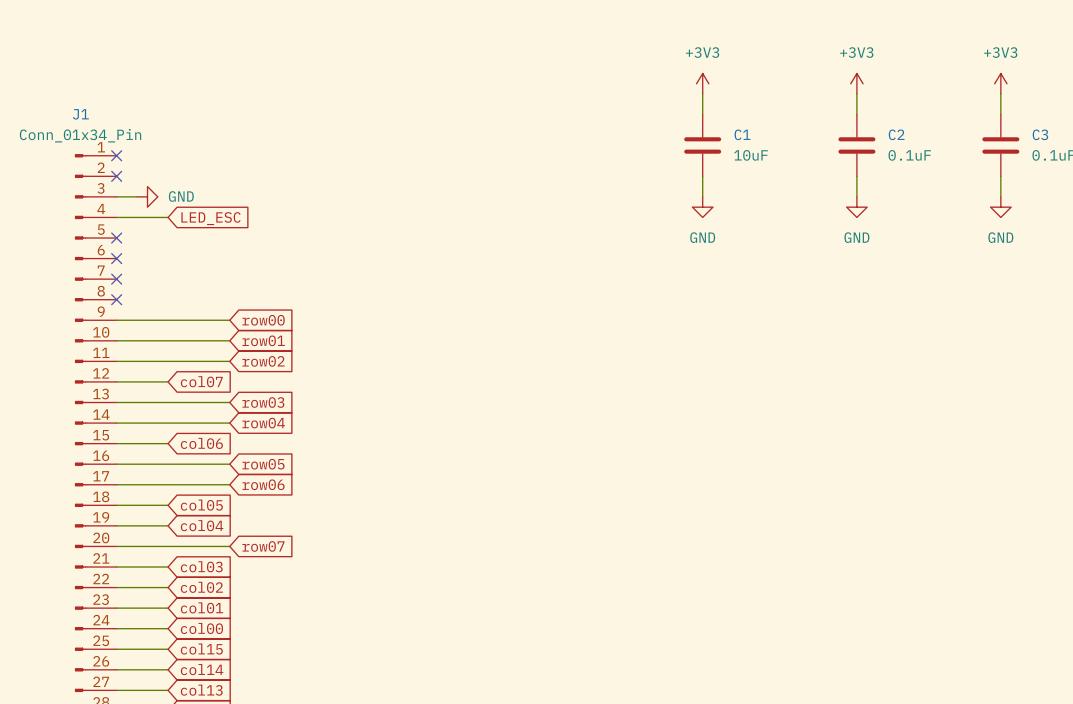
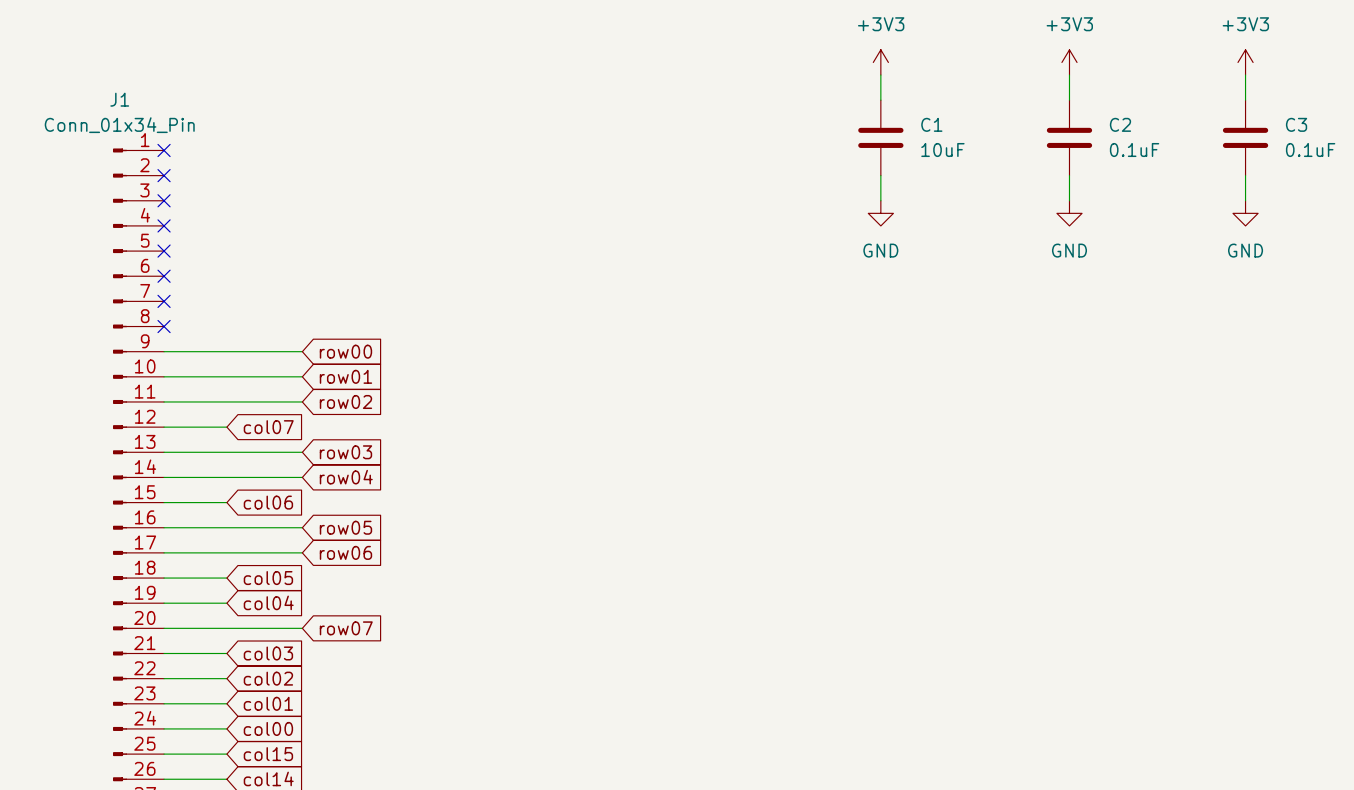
wire: (116, 196) (137, 196) -> none
no-connect mark: none -> (164, 200)
power symbol: GND (147, 196) -> none
wire: (116, 217) (168, 217) -> none
no-connect mark: none -> (164, 225)
global label: LED_ESC (211, 218) -> none

